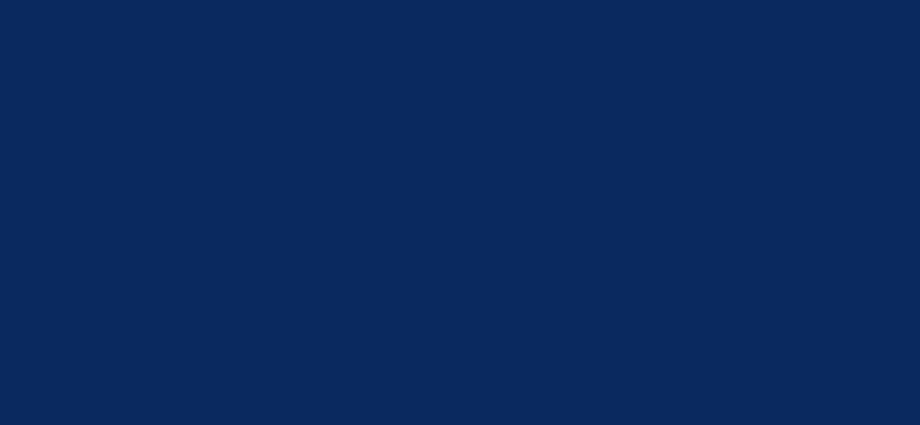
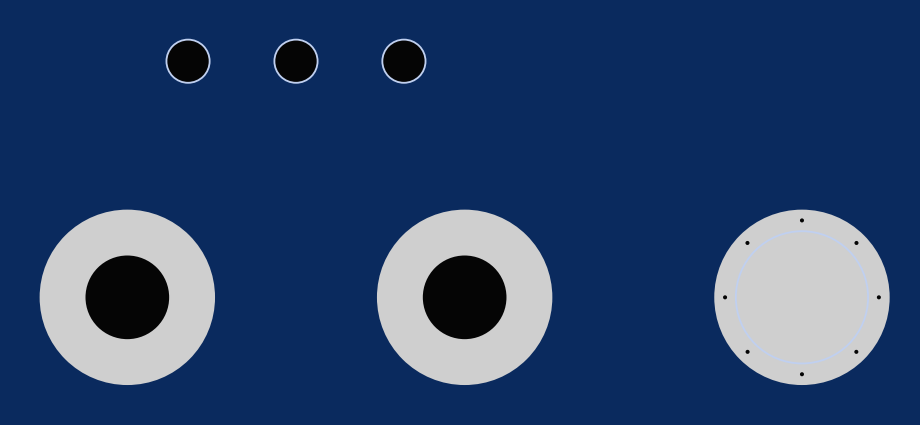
part: none -> (188, 61)
part: none -> (295, 61)
part: none -> (403, 61)
part: none -> (127, 297)
part: none -> (464, 297)
part: none -> (801, 297)

